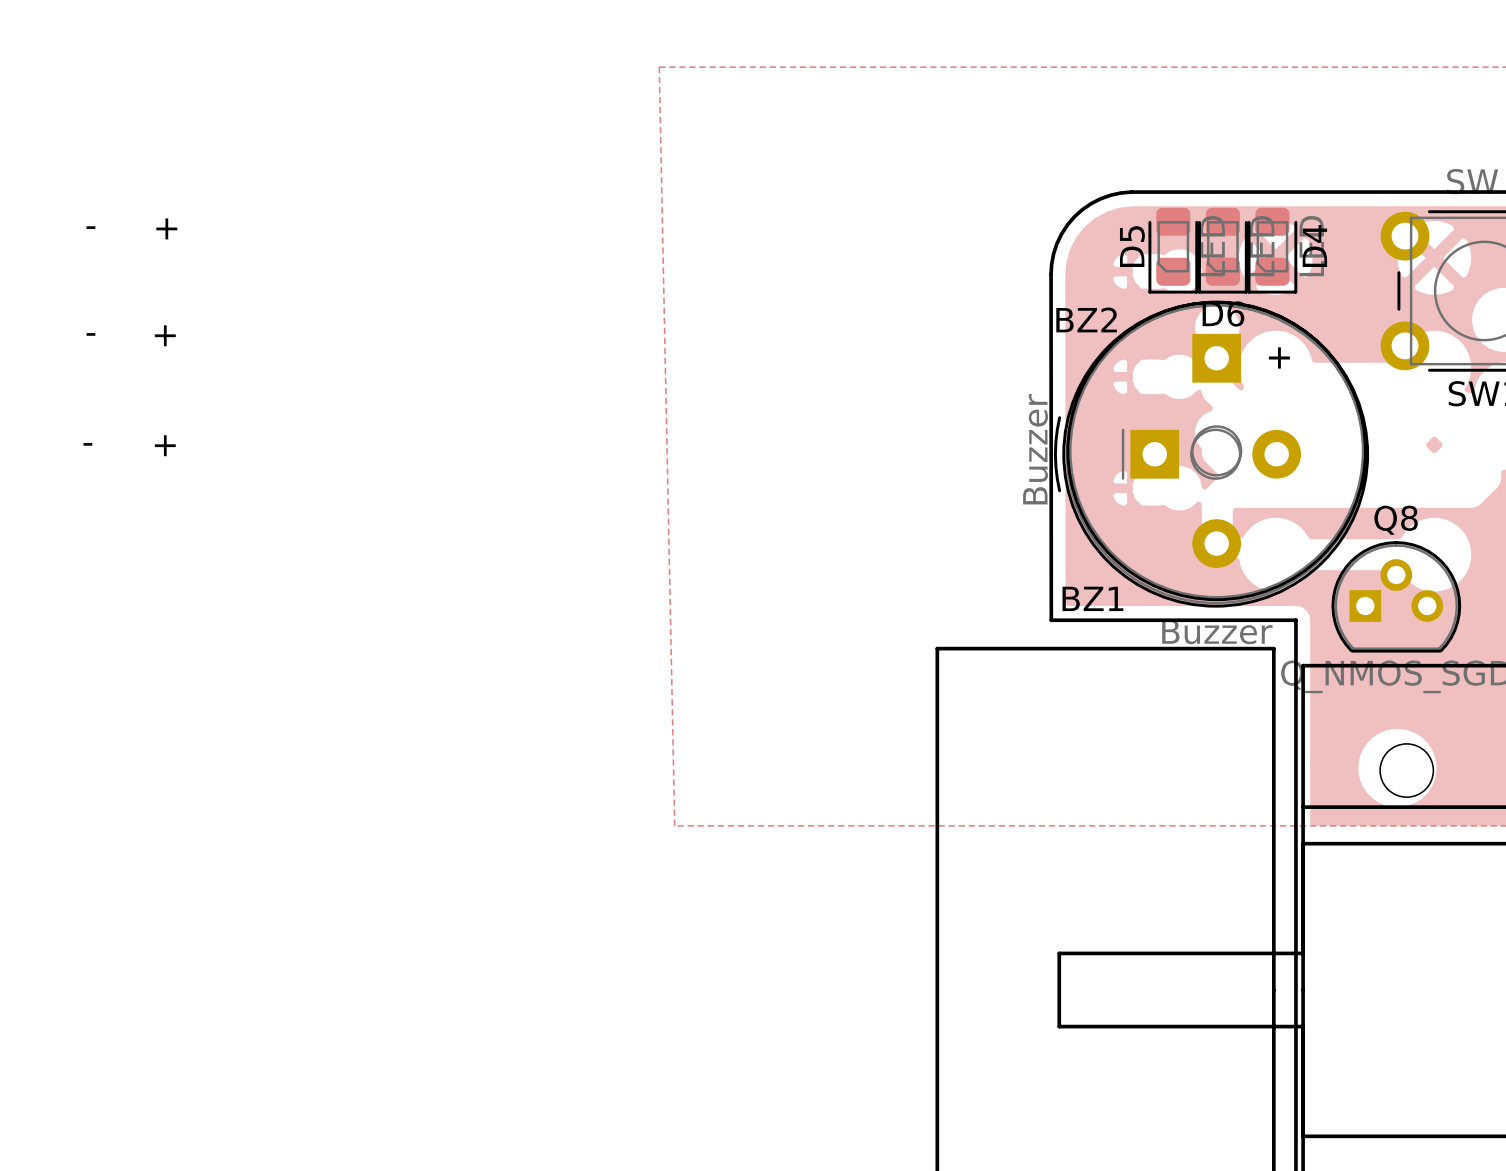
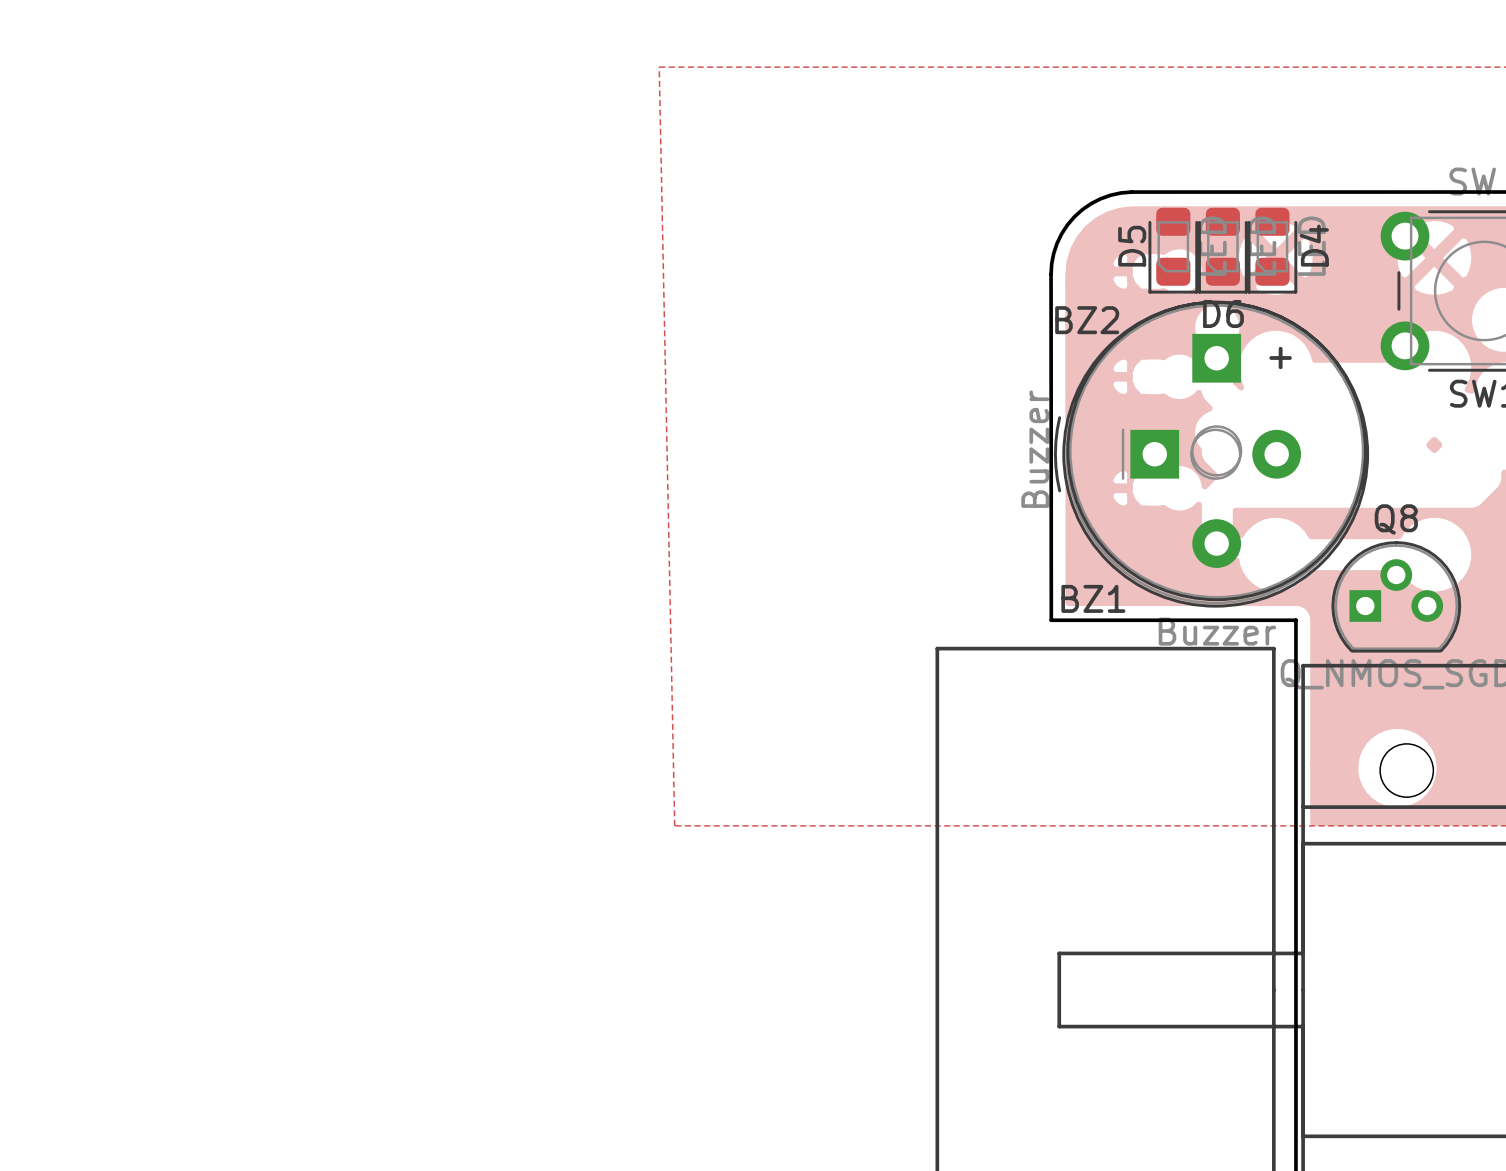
text: - (90, 227) -> none
text: + (166, 228) -> none
text: - (90, 334) -> none
text: + (165, 335) -> none
text: - (87, 444) -> none
text: + (165, 445) -> none

